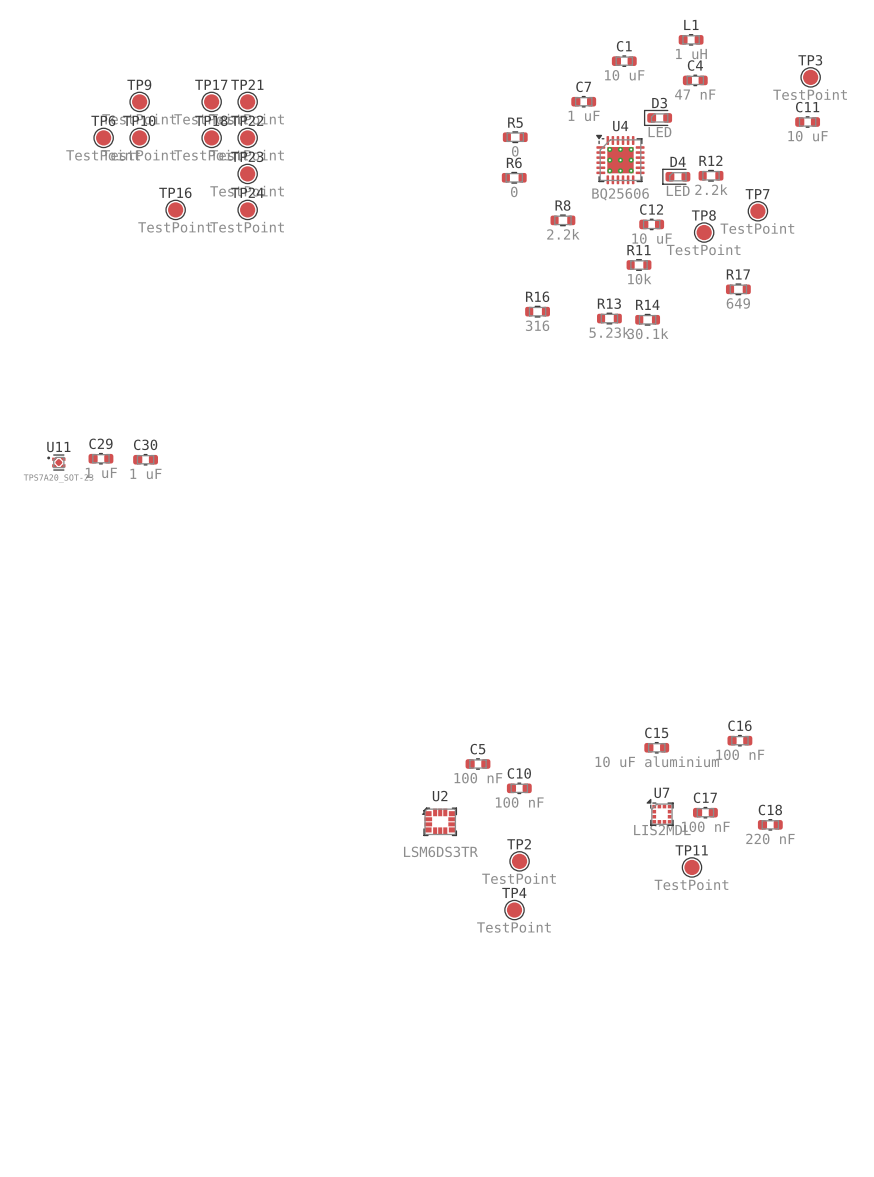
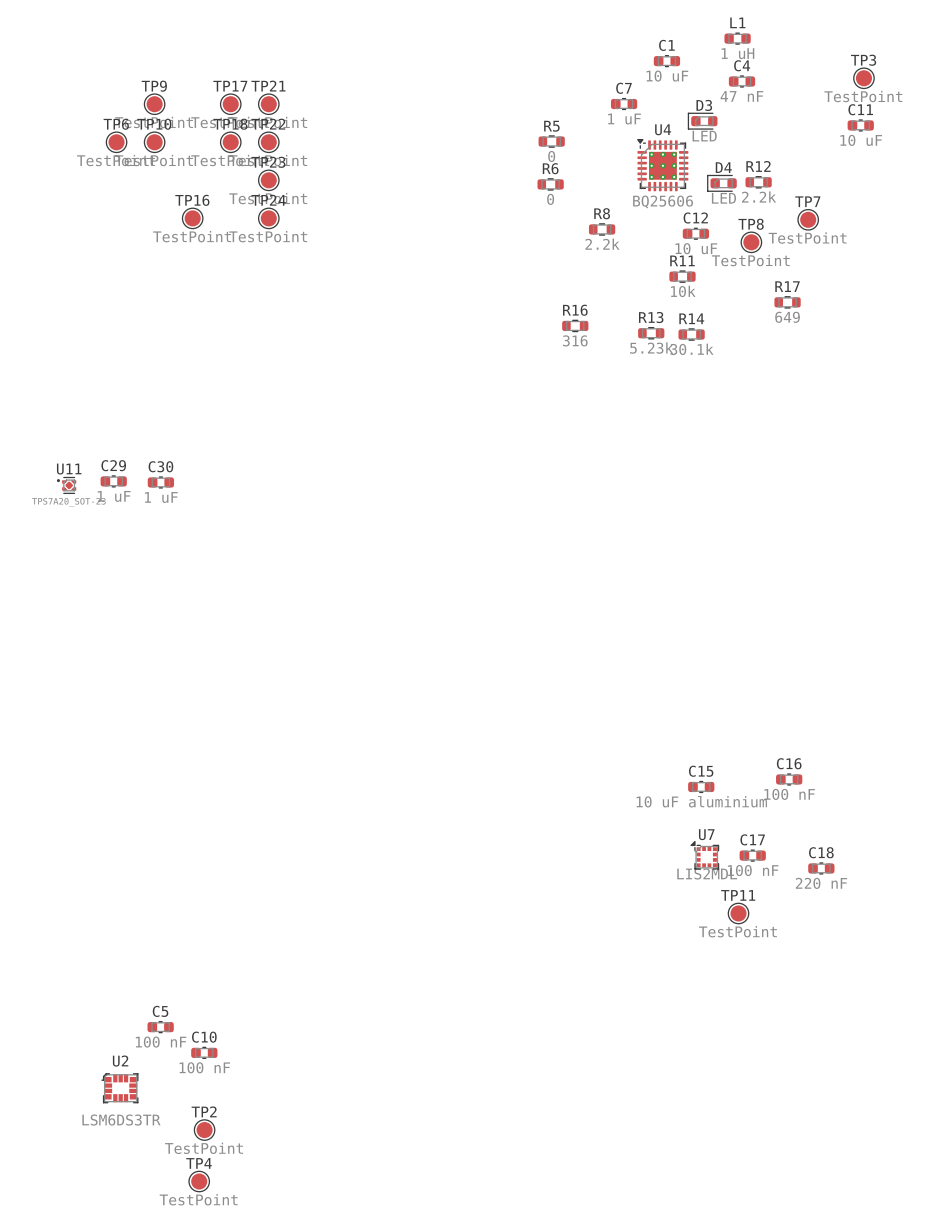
C5 position: (477, 764) -> (160, 1027)
C10 position: (519, 788) -> (204, 1052)
U2 position: (439, 821) -> (119, 1088)
TP2 position: (519, 861) -> (204, 1130)
TP4 position: (514, 910) -> (199, 1181)

